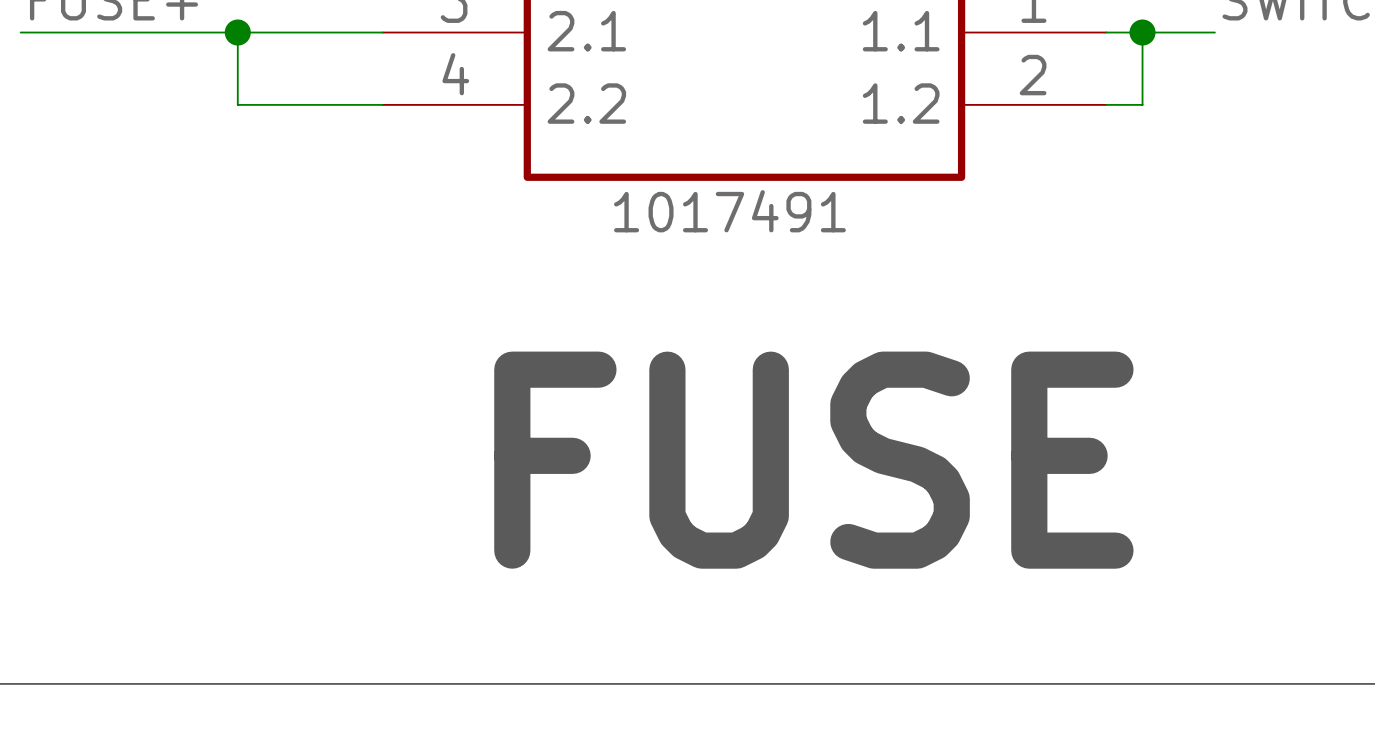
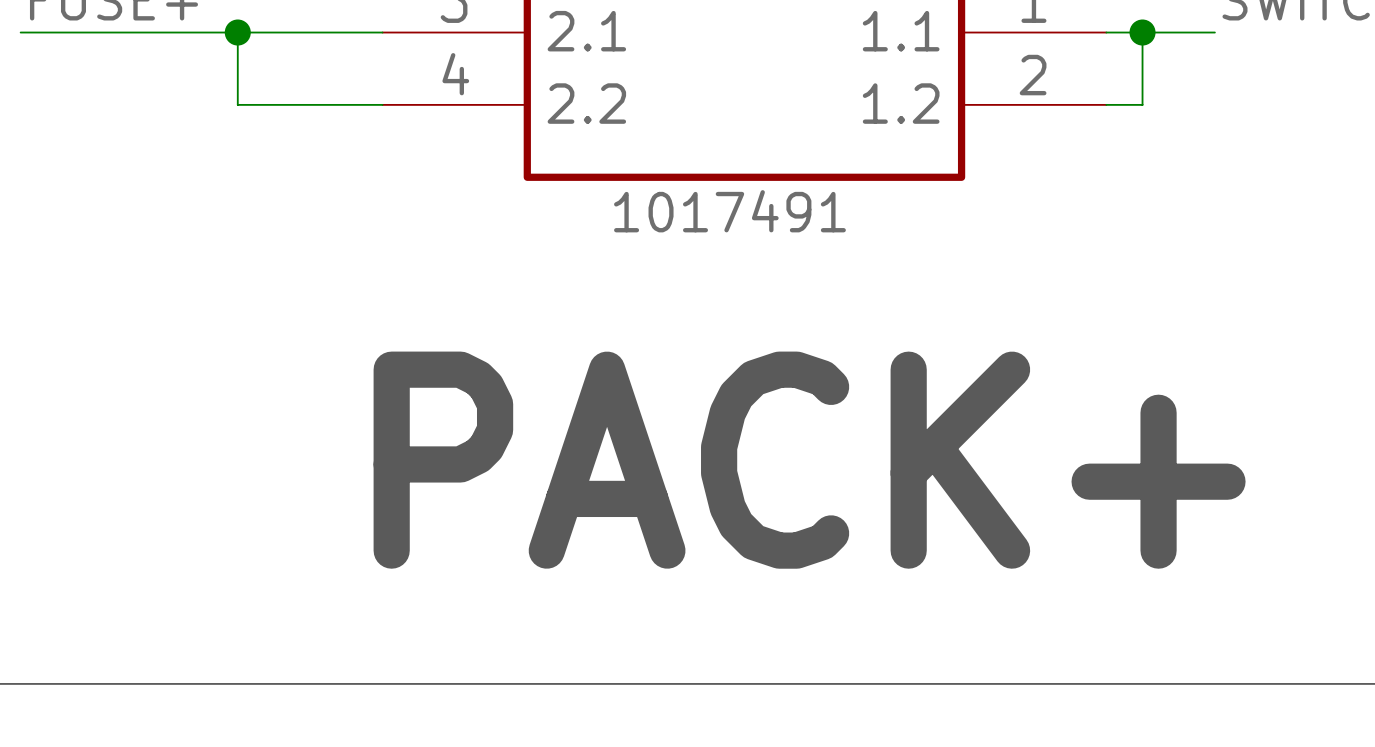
text: FUSE (813, 460) -> PACK+ (809, 460)

